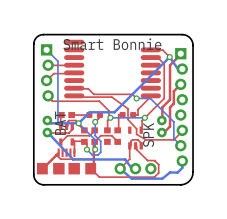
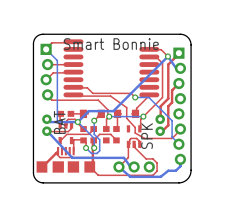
top track: none -> (73, 41) (51, 42) (46, 48)
part footprint: [86, 112, 103, 119] -> [79, 109, 105, 119]
part footprint: [119, 112, 137, 119] -> [114, 109, 140, 119]

